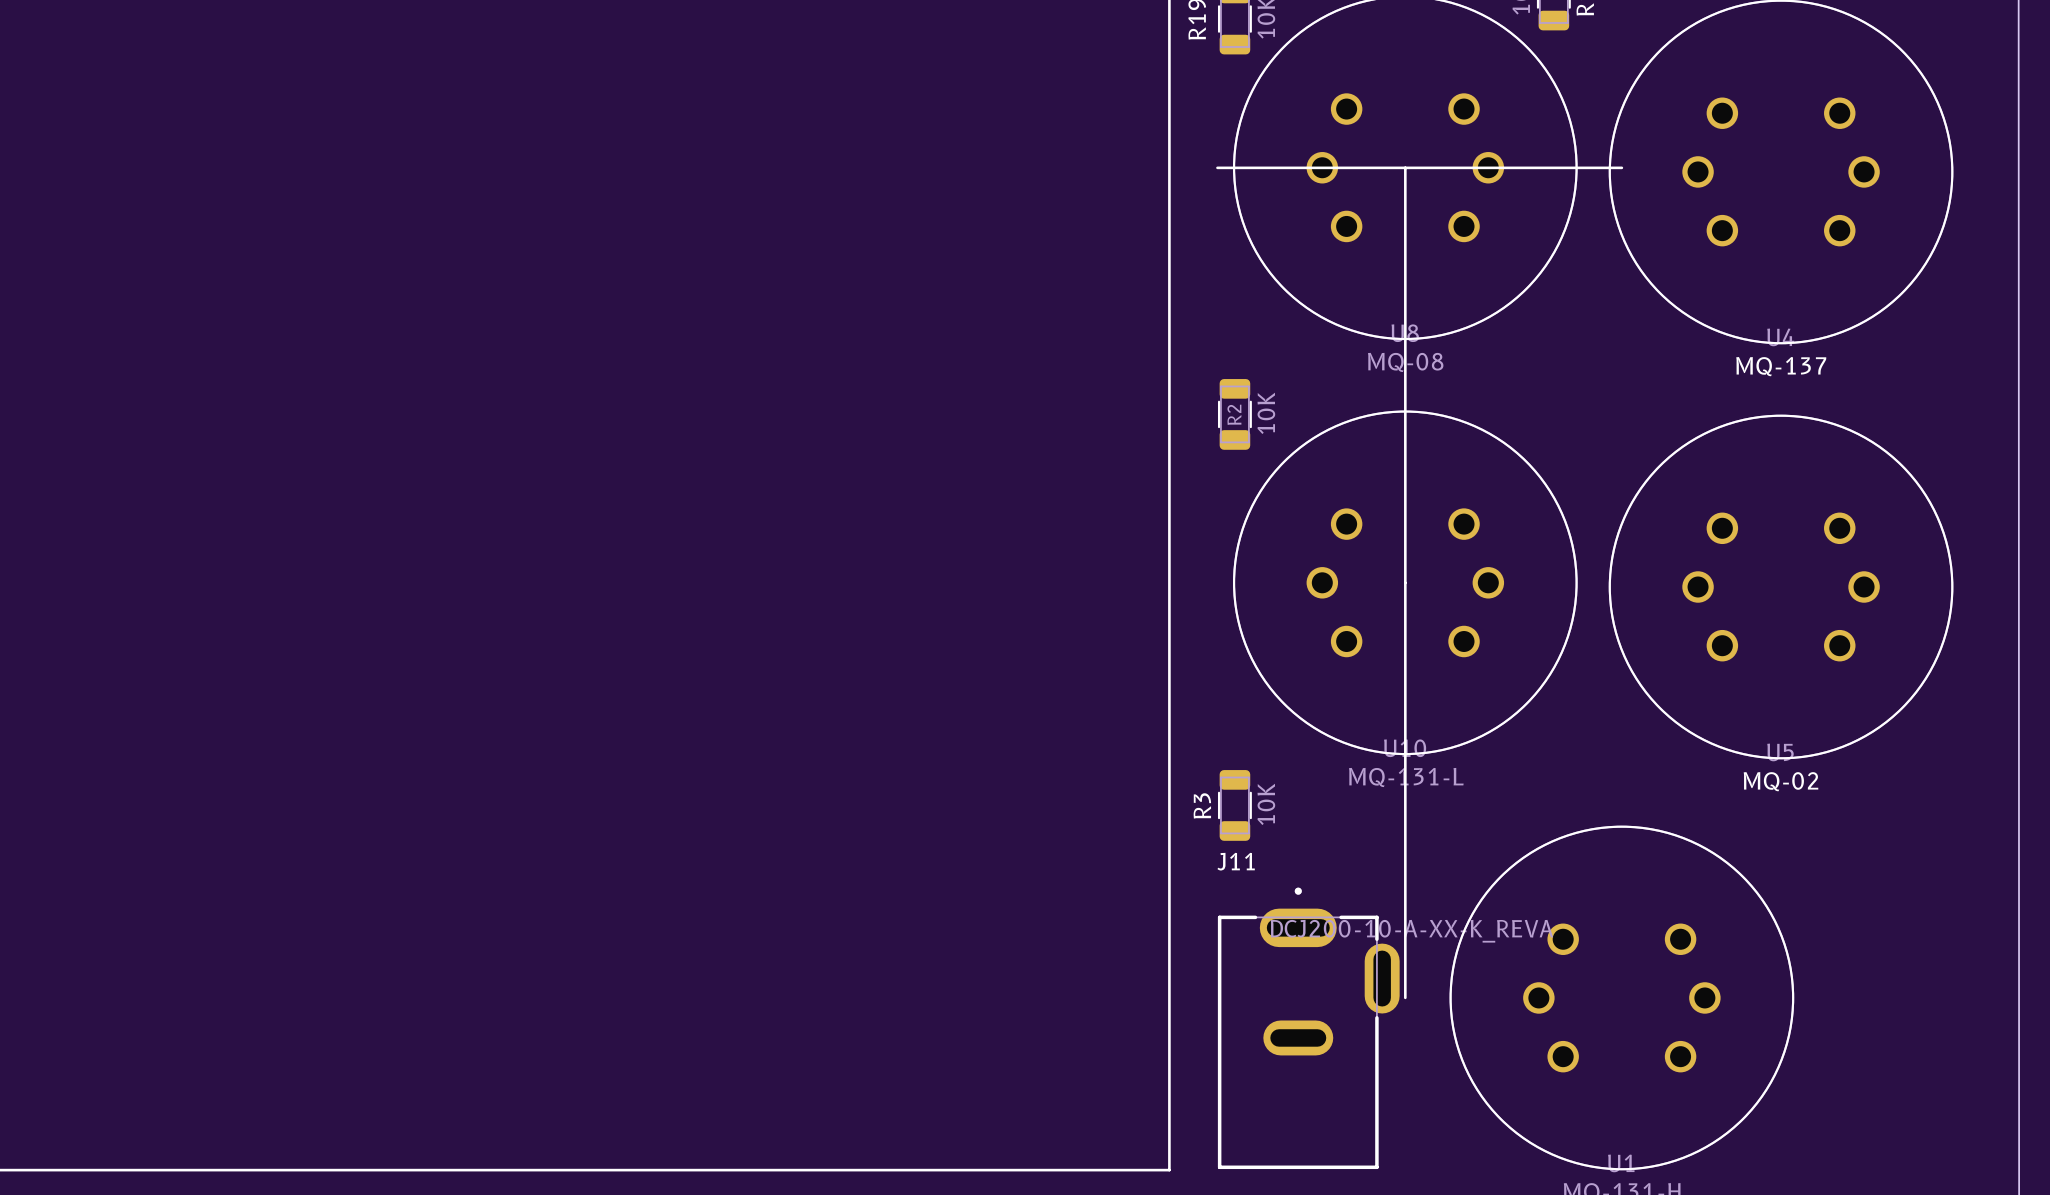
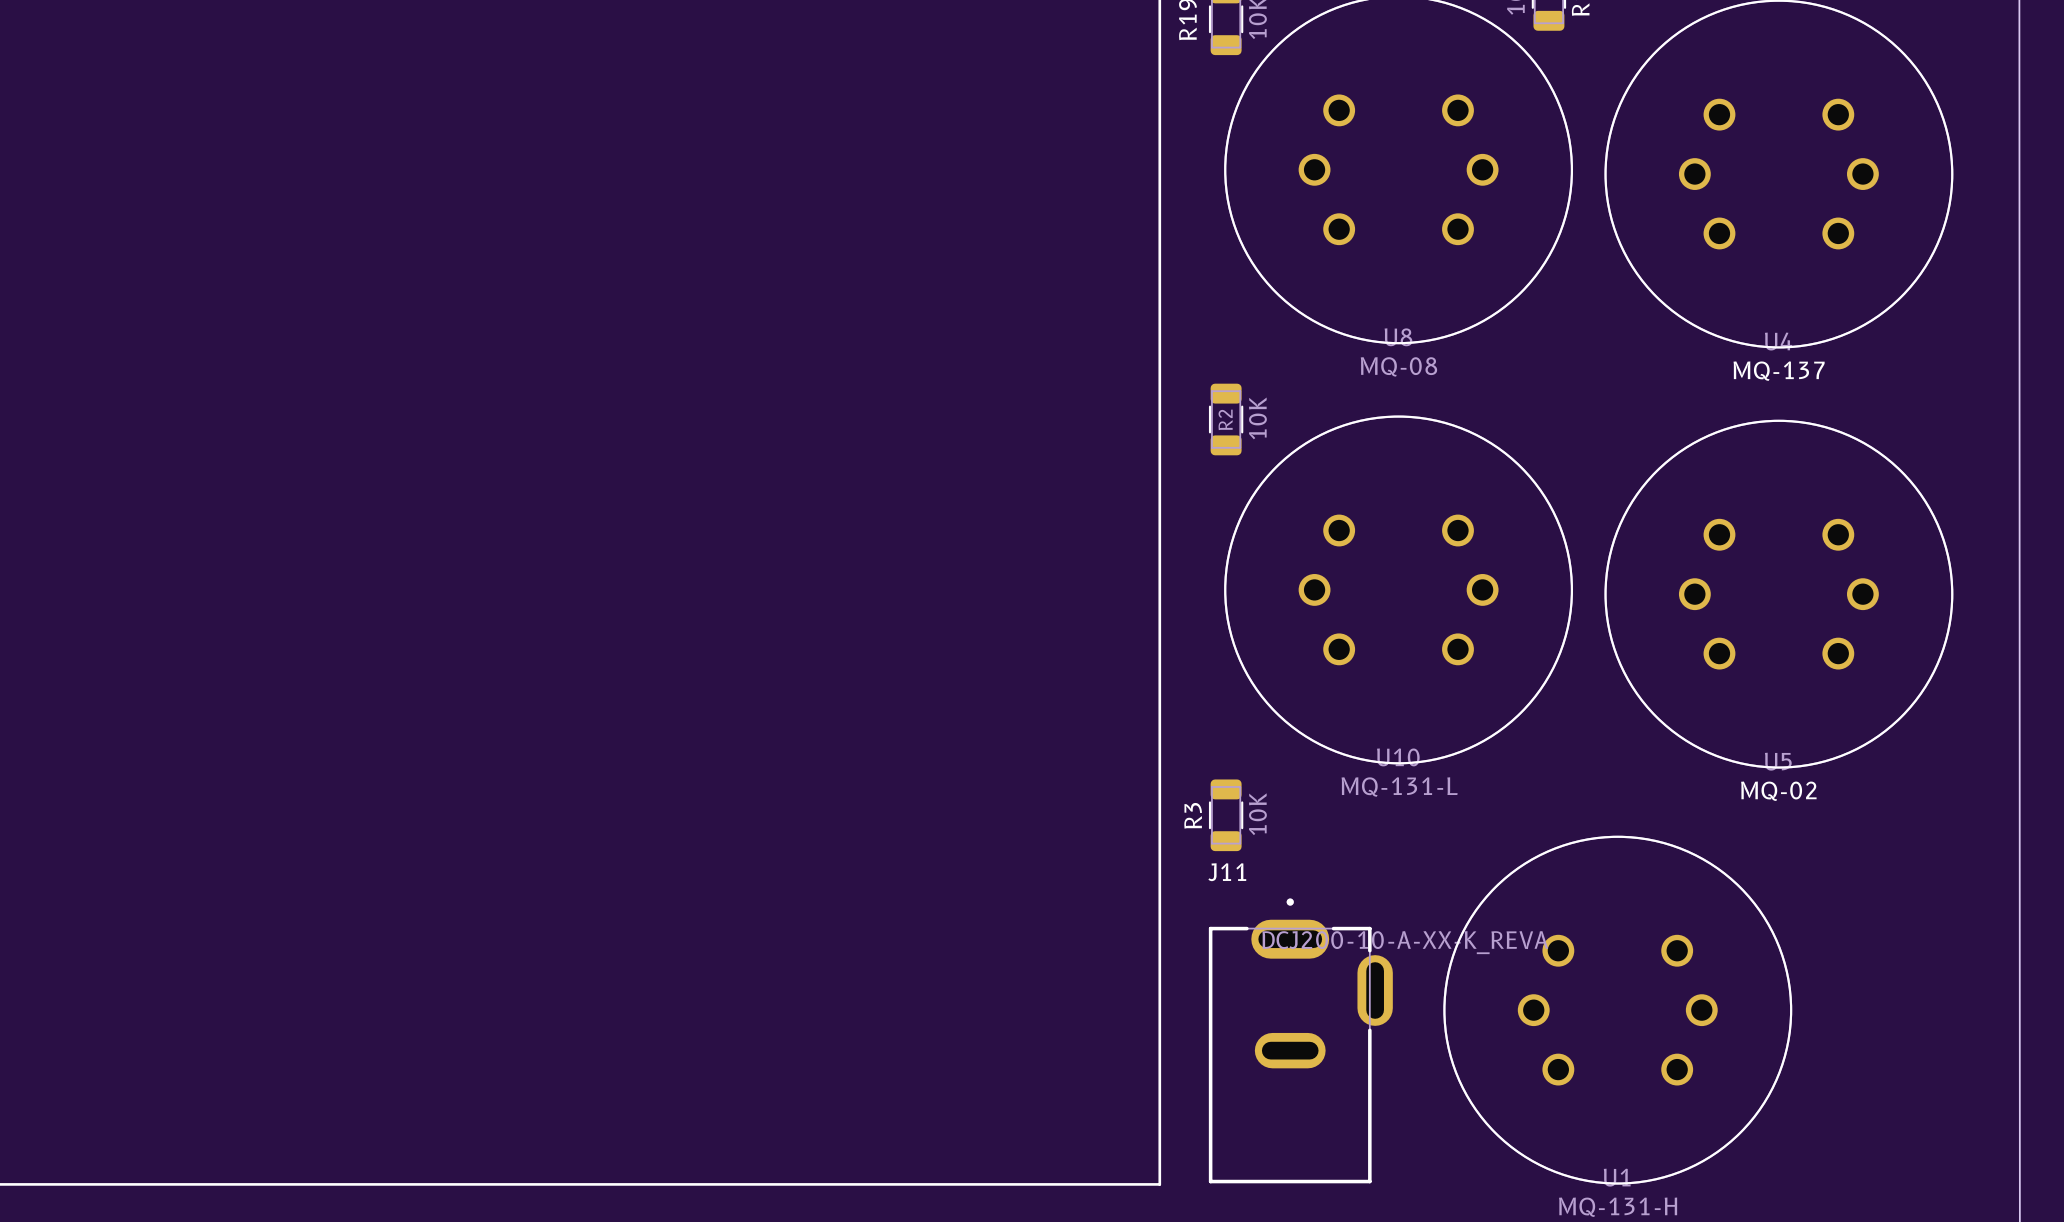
line: (1217, 167) (1621, 167) -> none
line: (1405, 167) (1405, 997) -> none

